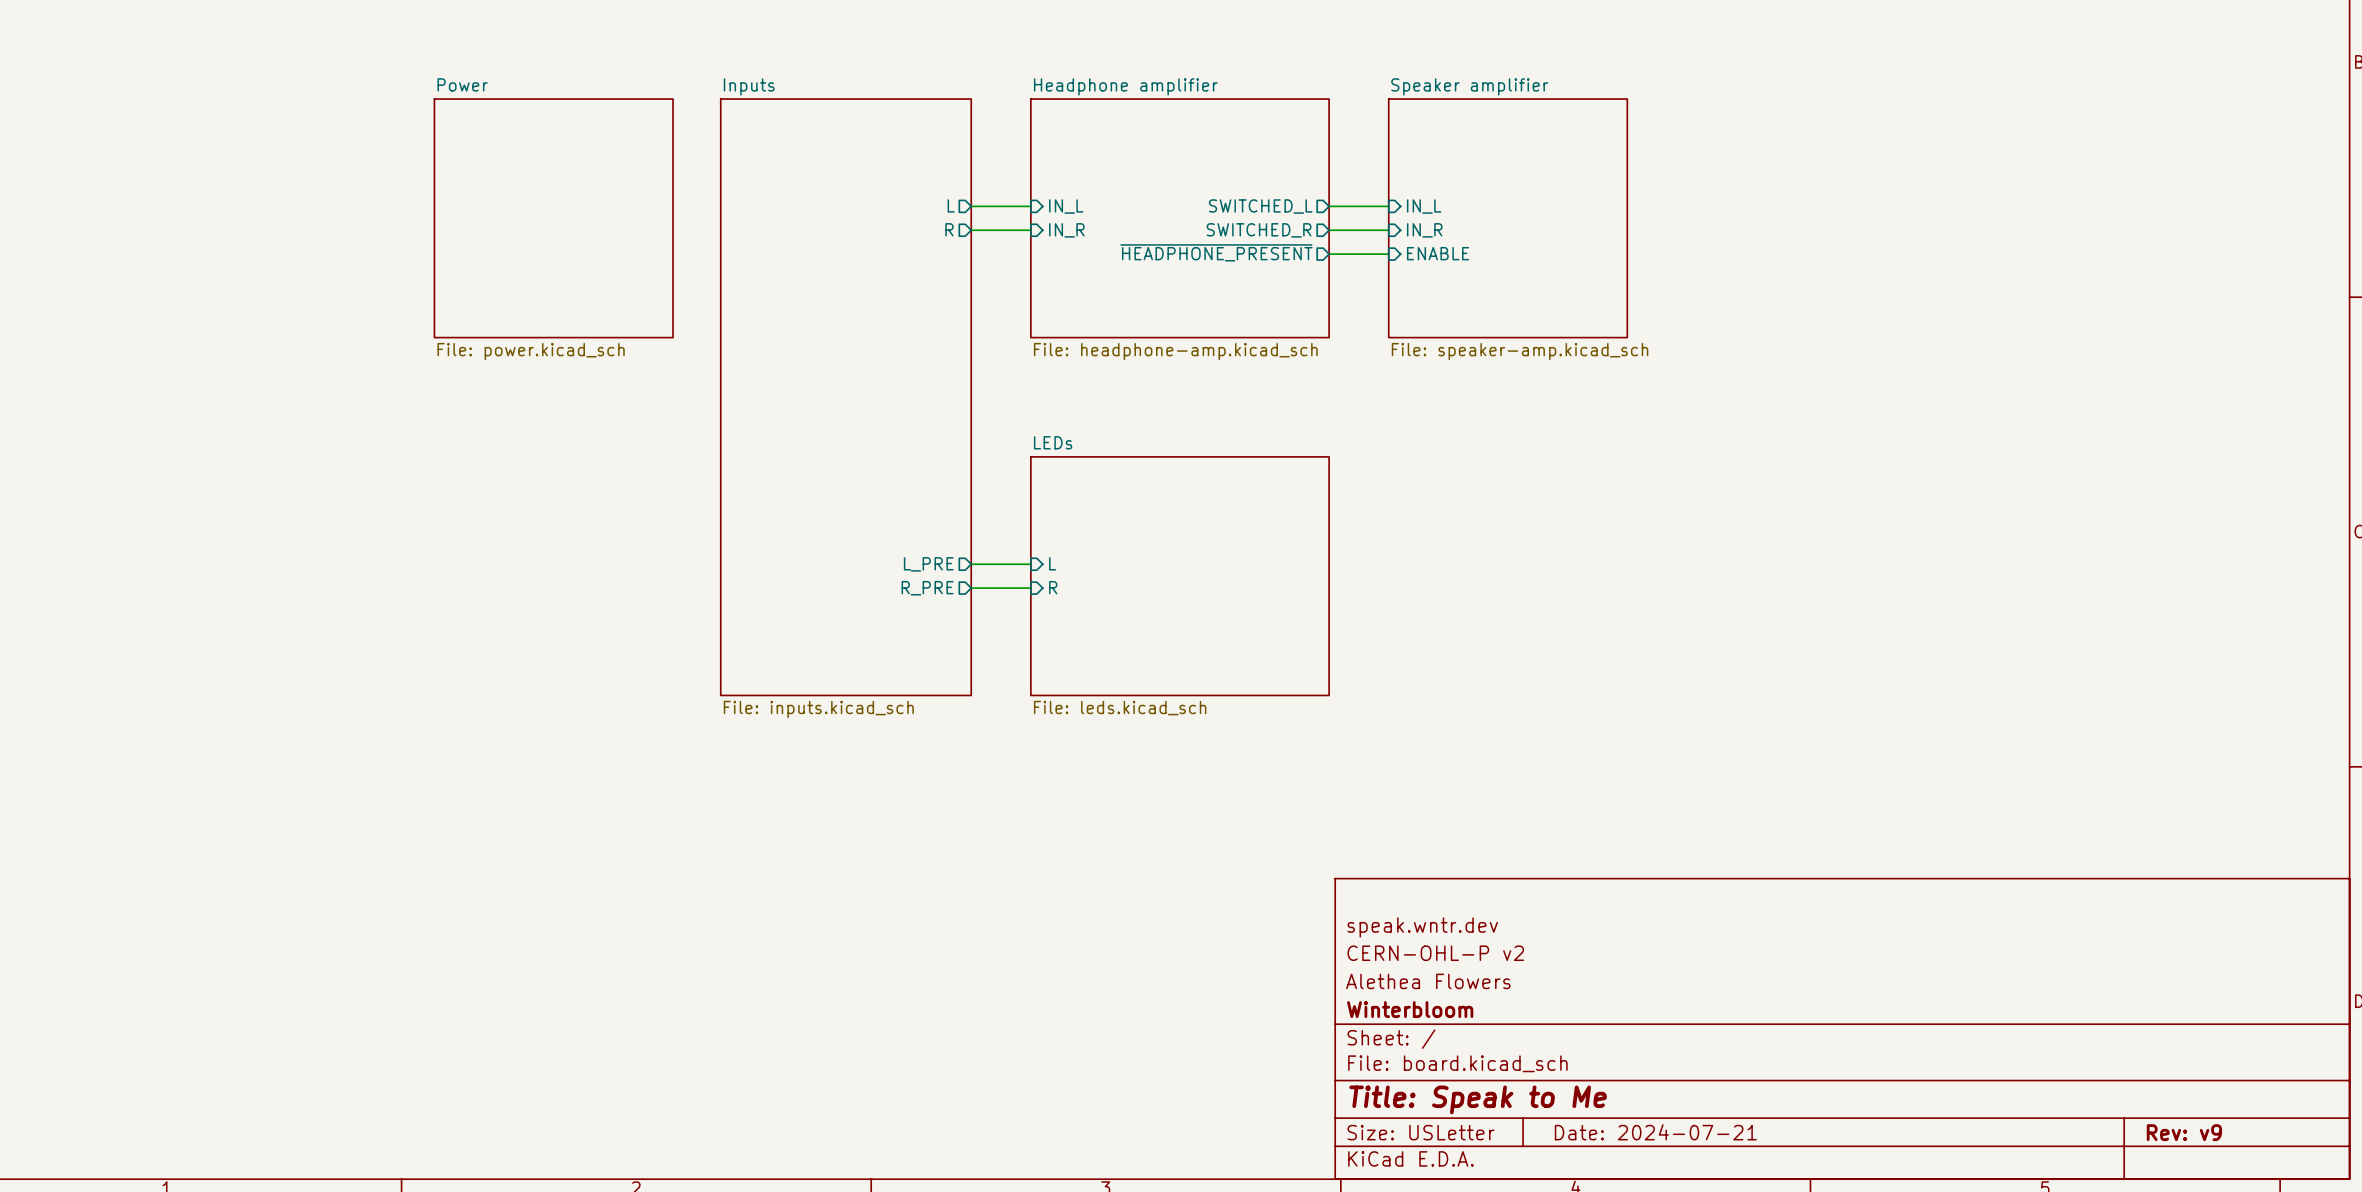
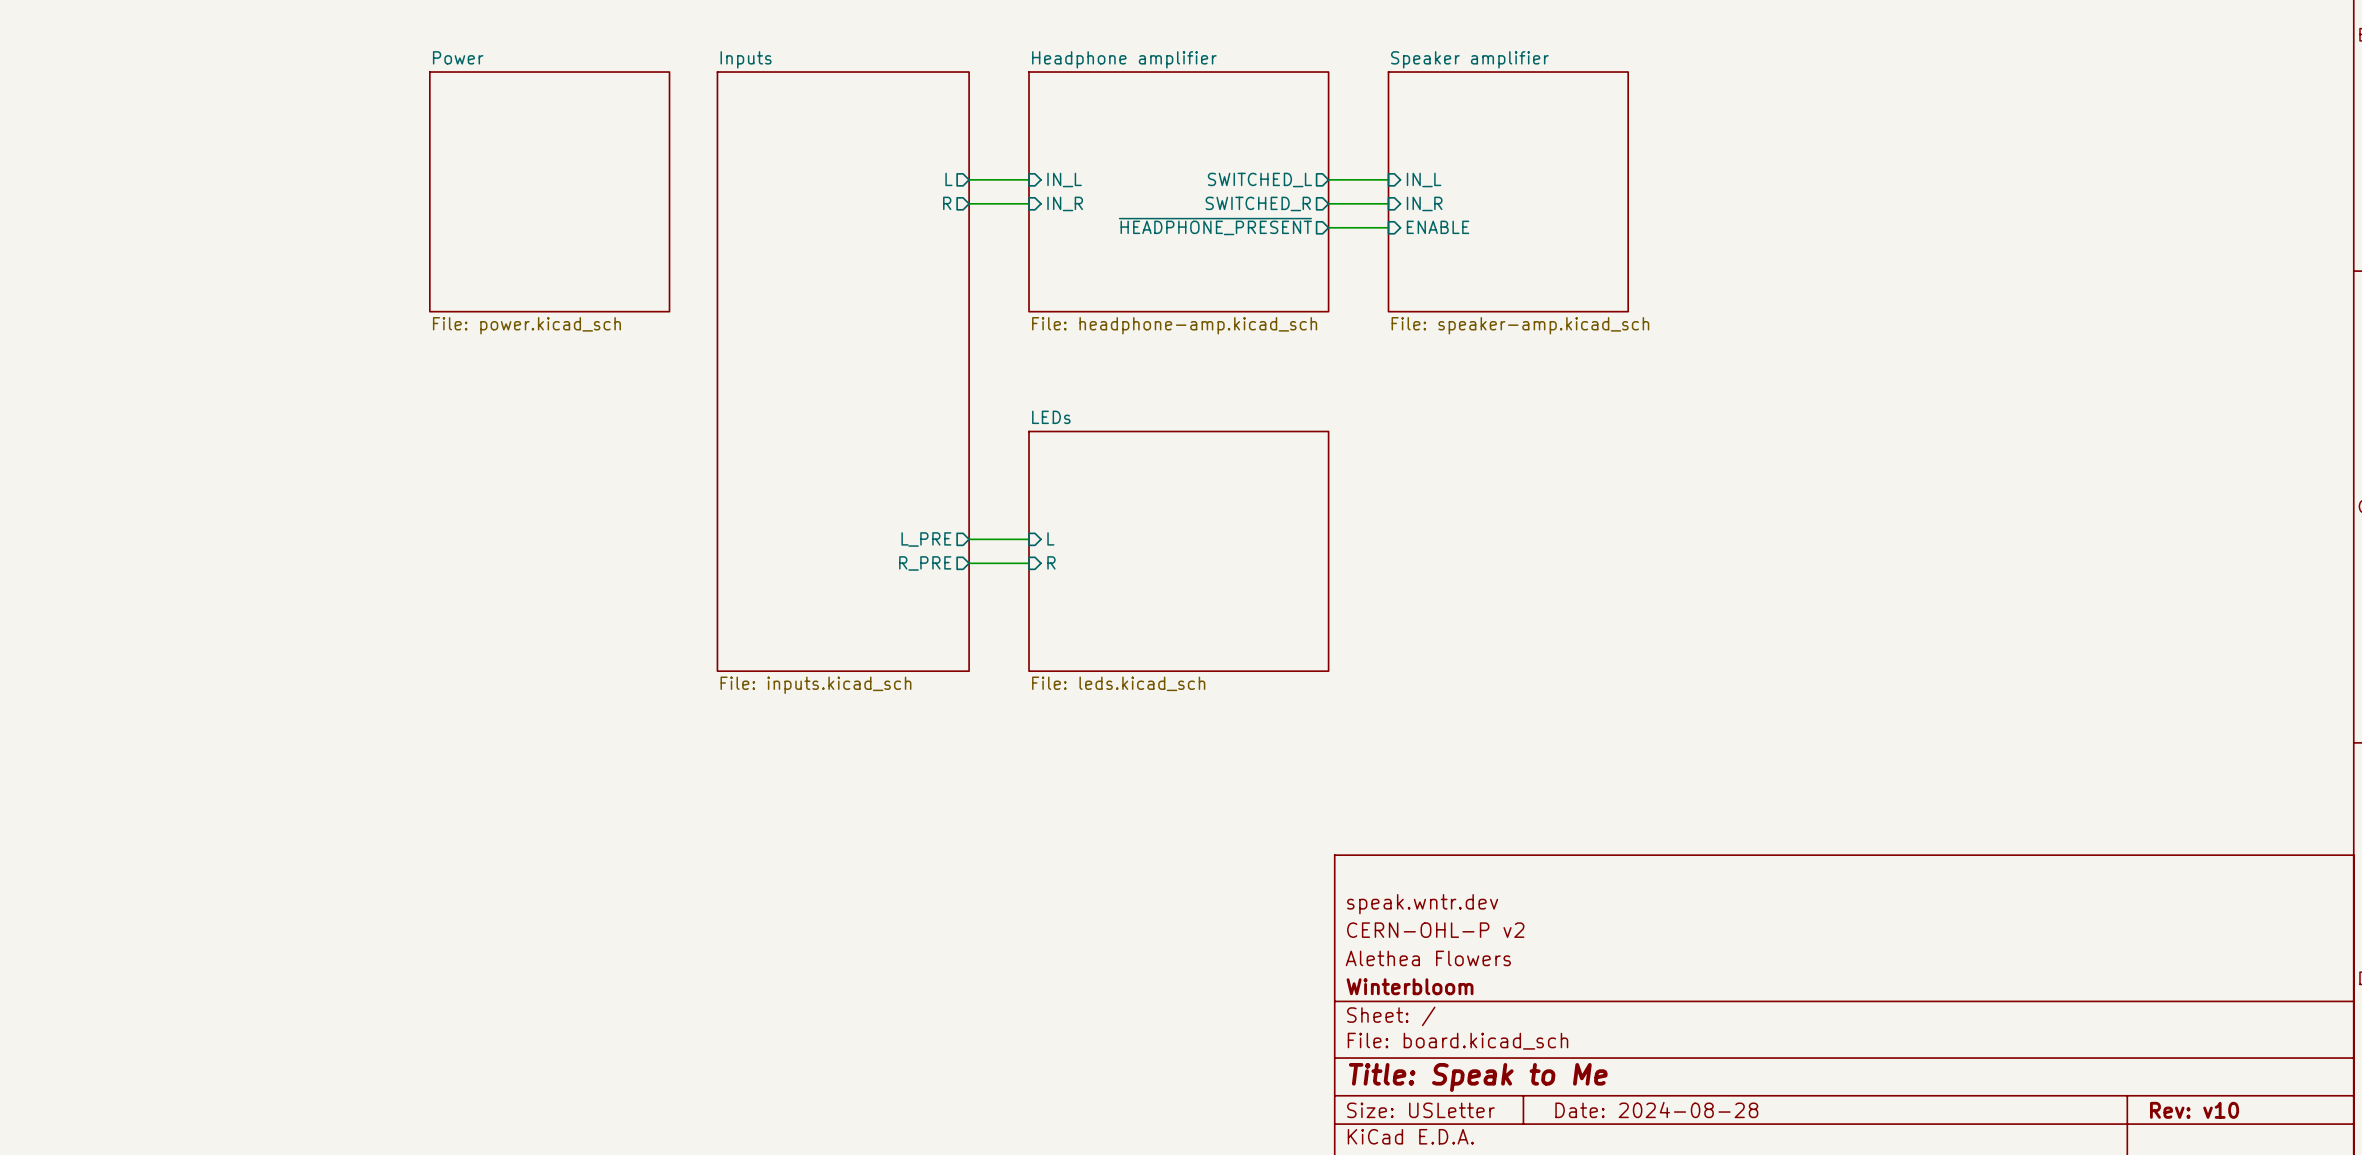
title block: Date: 2024-07-21 (1655, 1132) -> Date: 2024-08-28 (1656, 1110)
title block: Rev: v9 (2184, 1132) -> Rev: v10 (2194, 1110)

